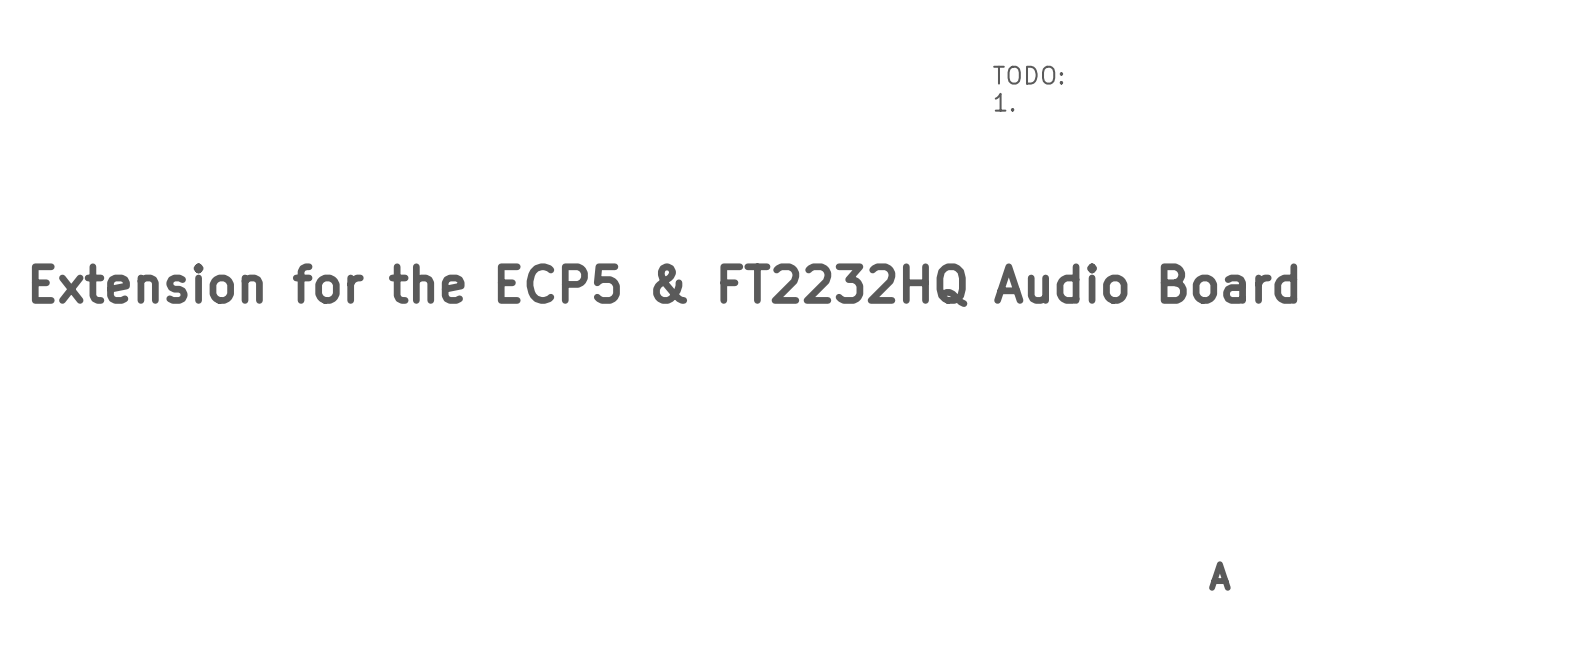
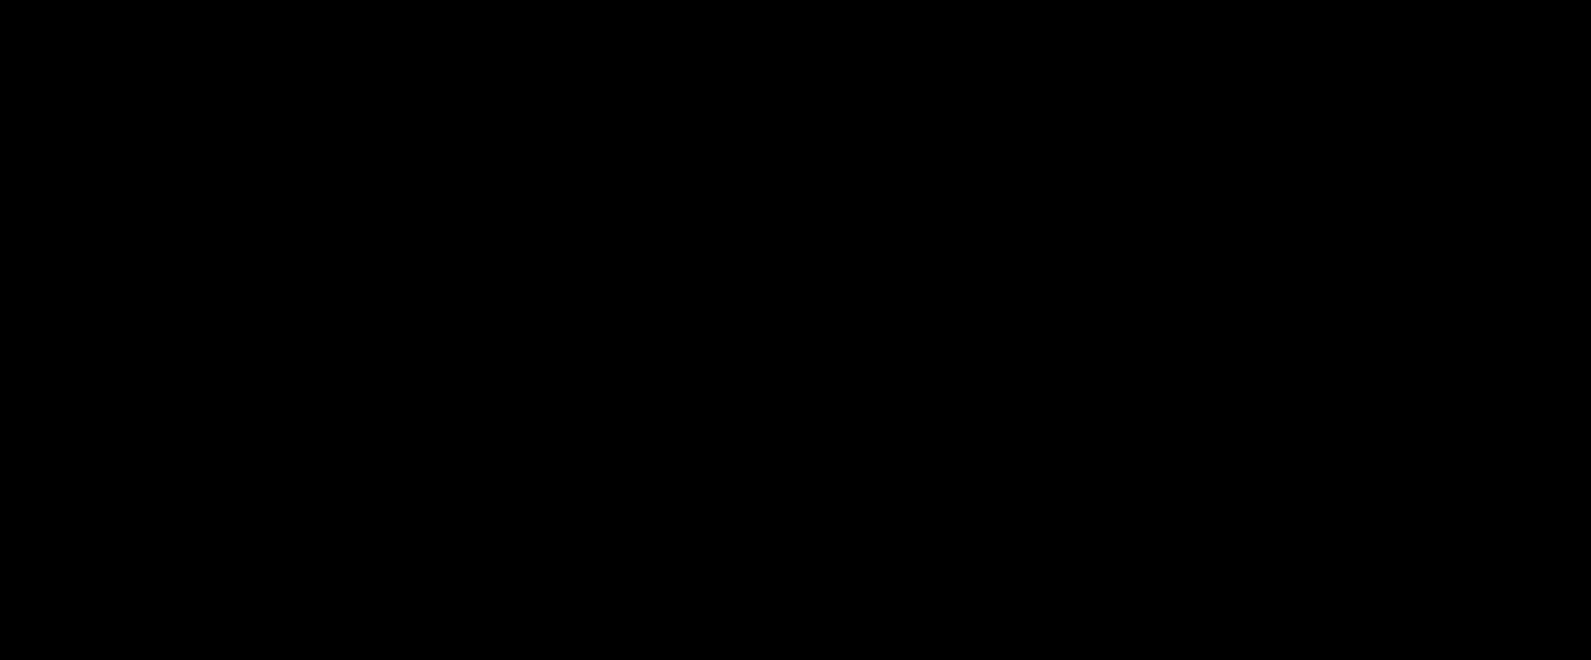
text: TODO: (1028, 75) -> none
text: 1. (1004, 102) -> none
text: Extension for the ECP5 & FT2232HQ Audio Board (664, 285) -> none
text: A (1219, 576) -> none

